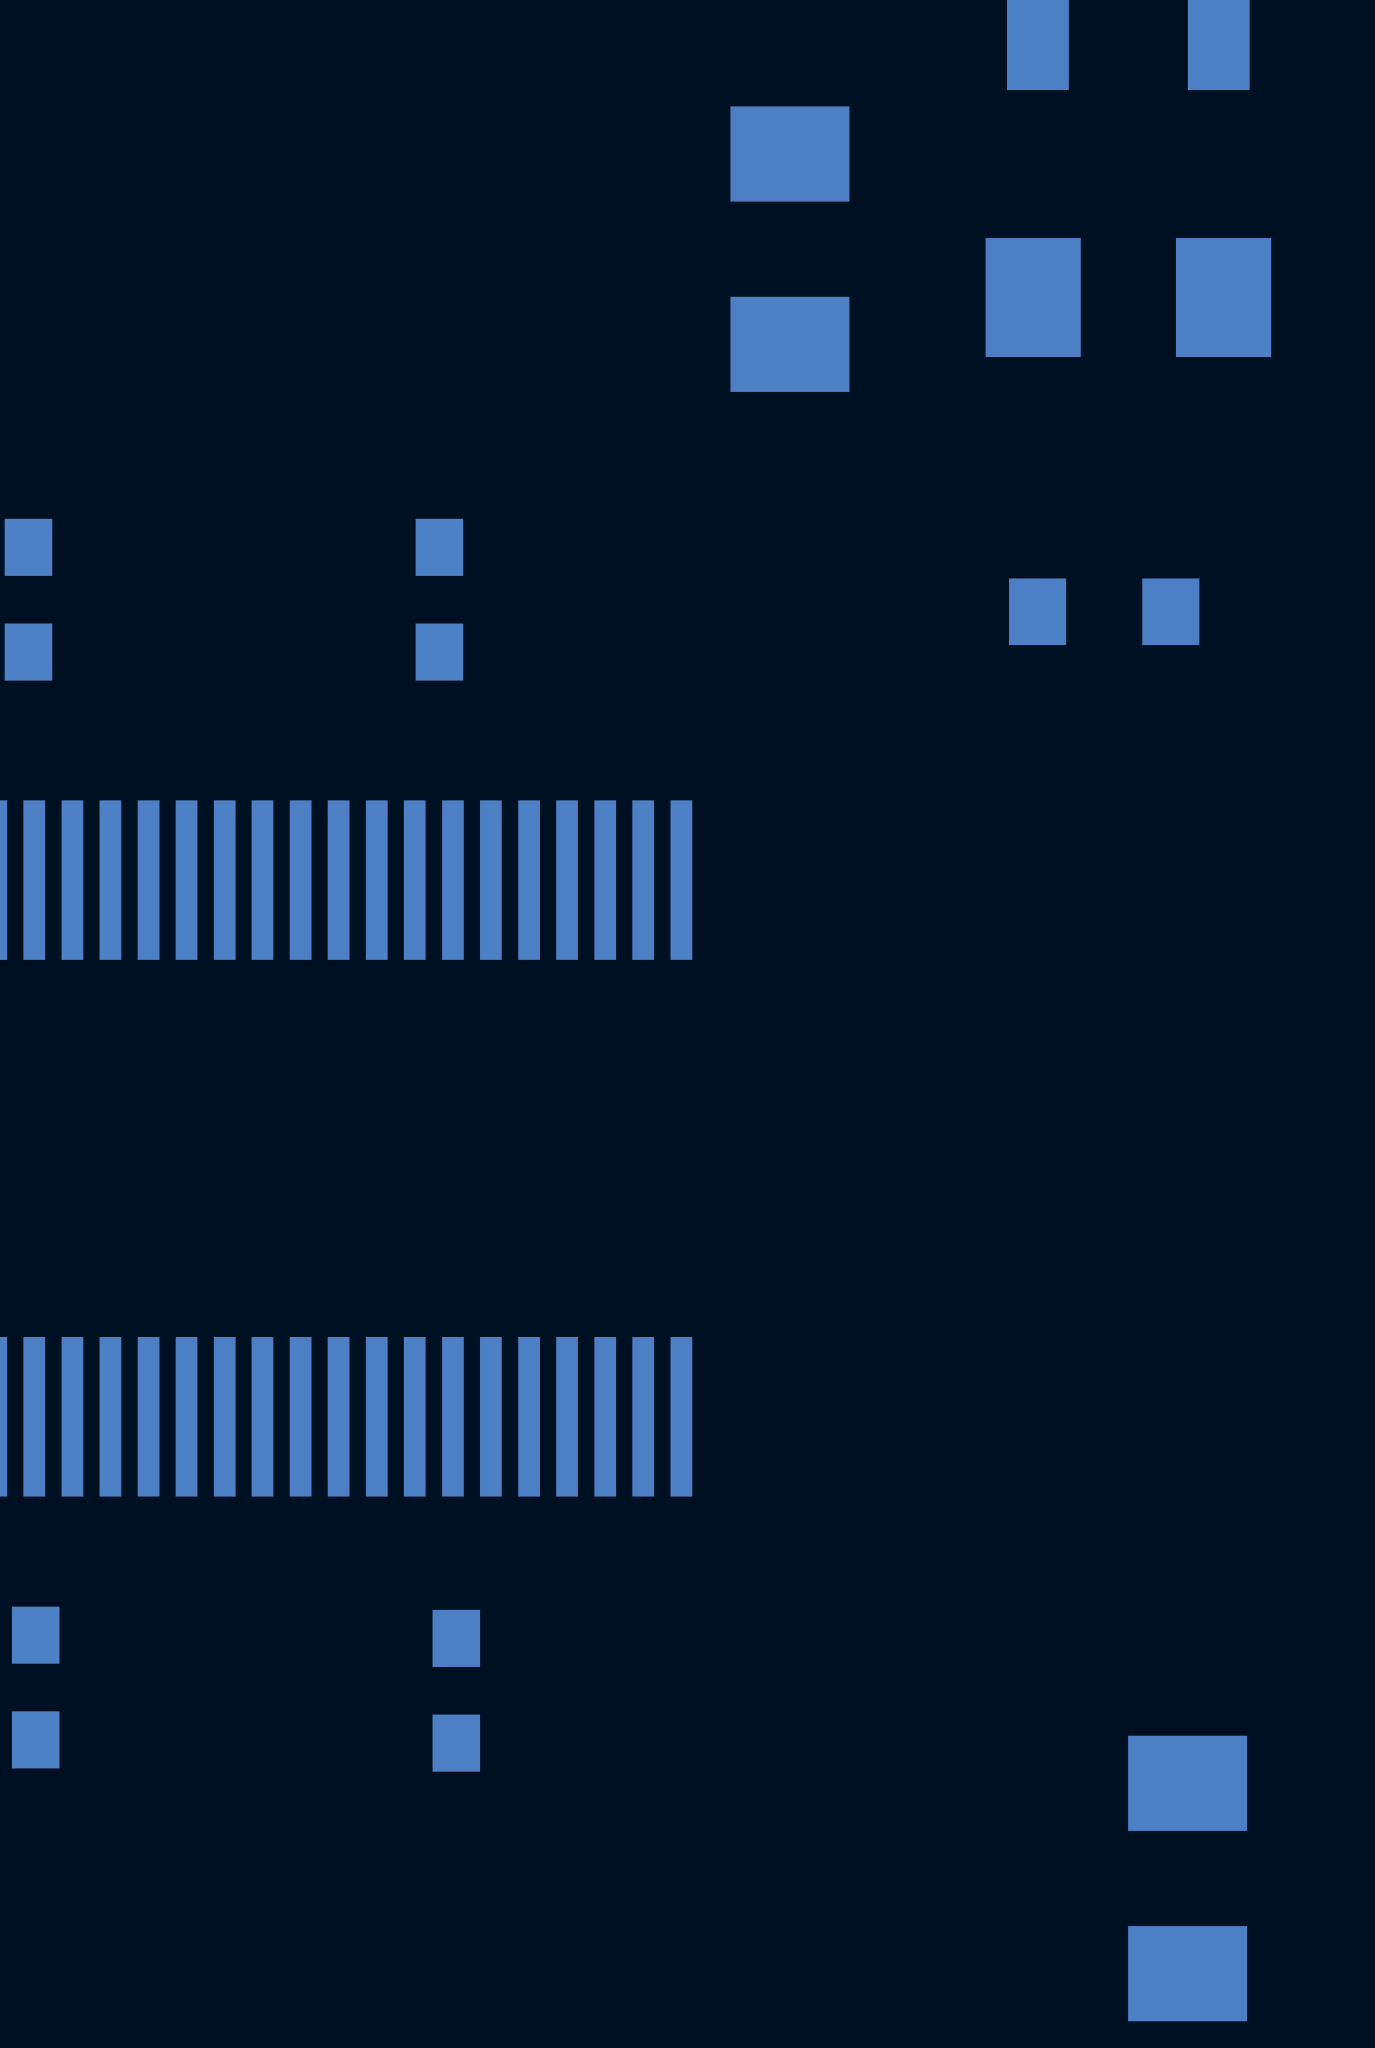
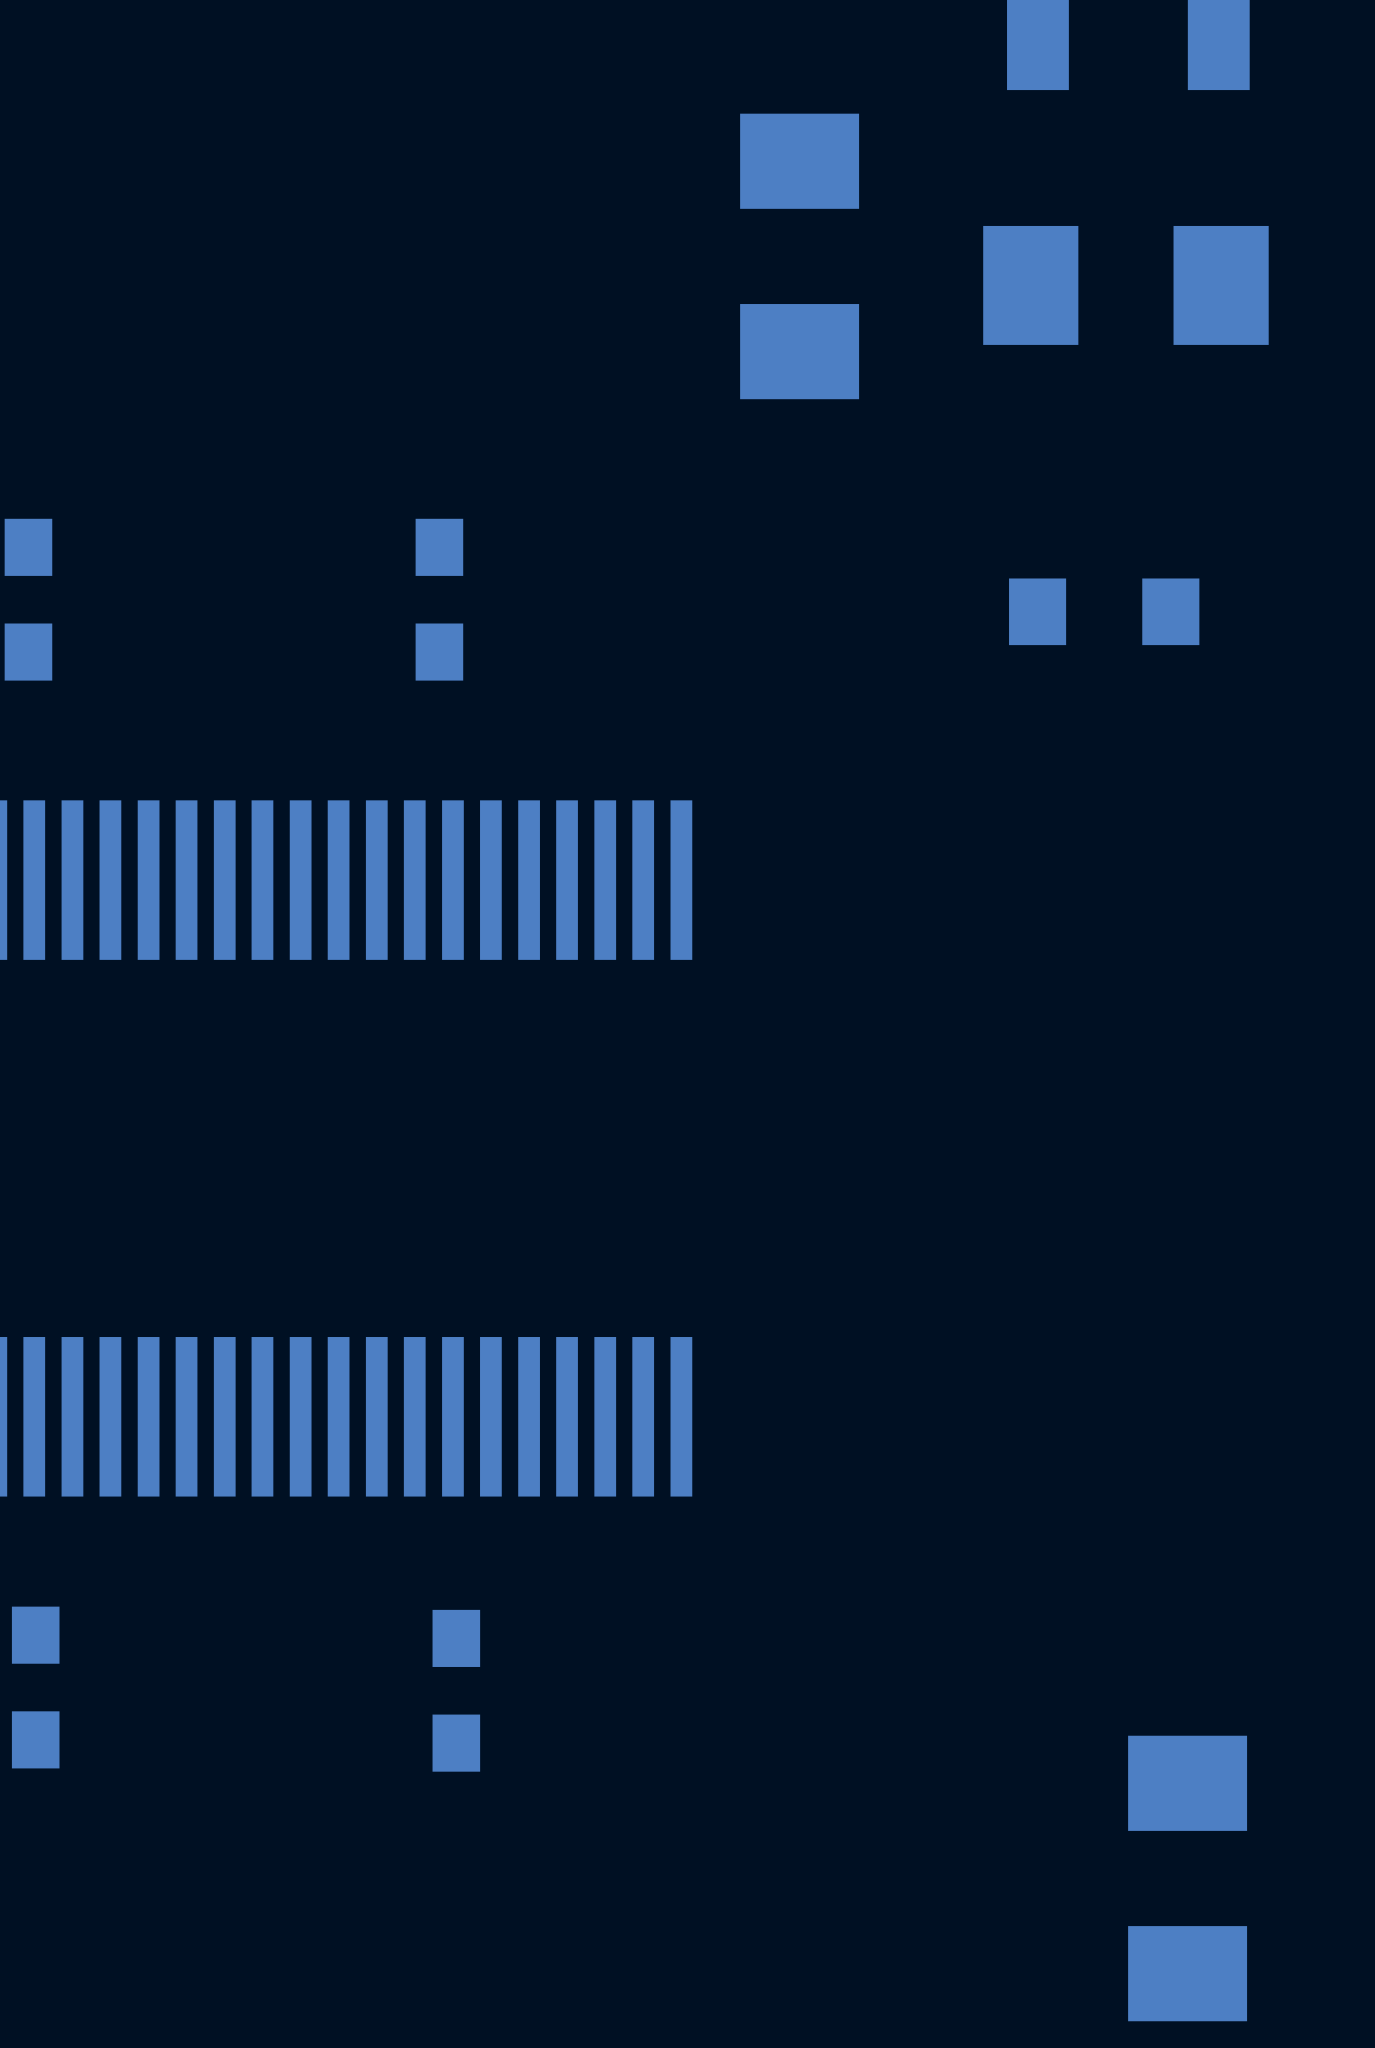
part position: (789, 249) -> (799, 256)
part position: (1128, 297) -> (1125, 285)

